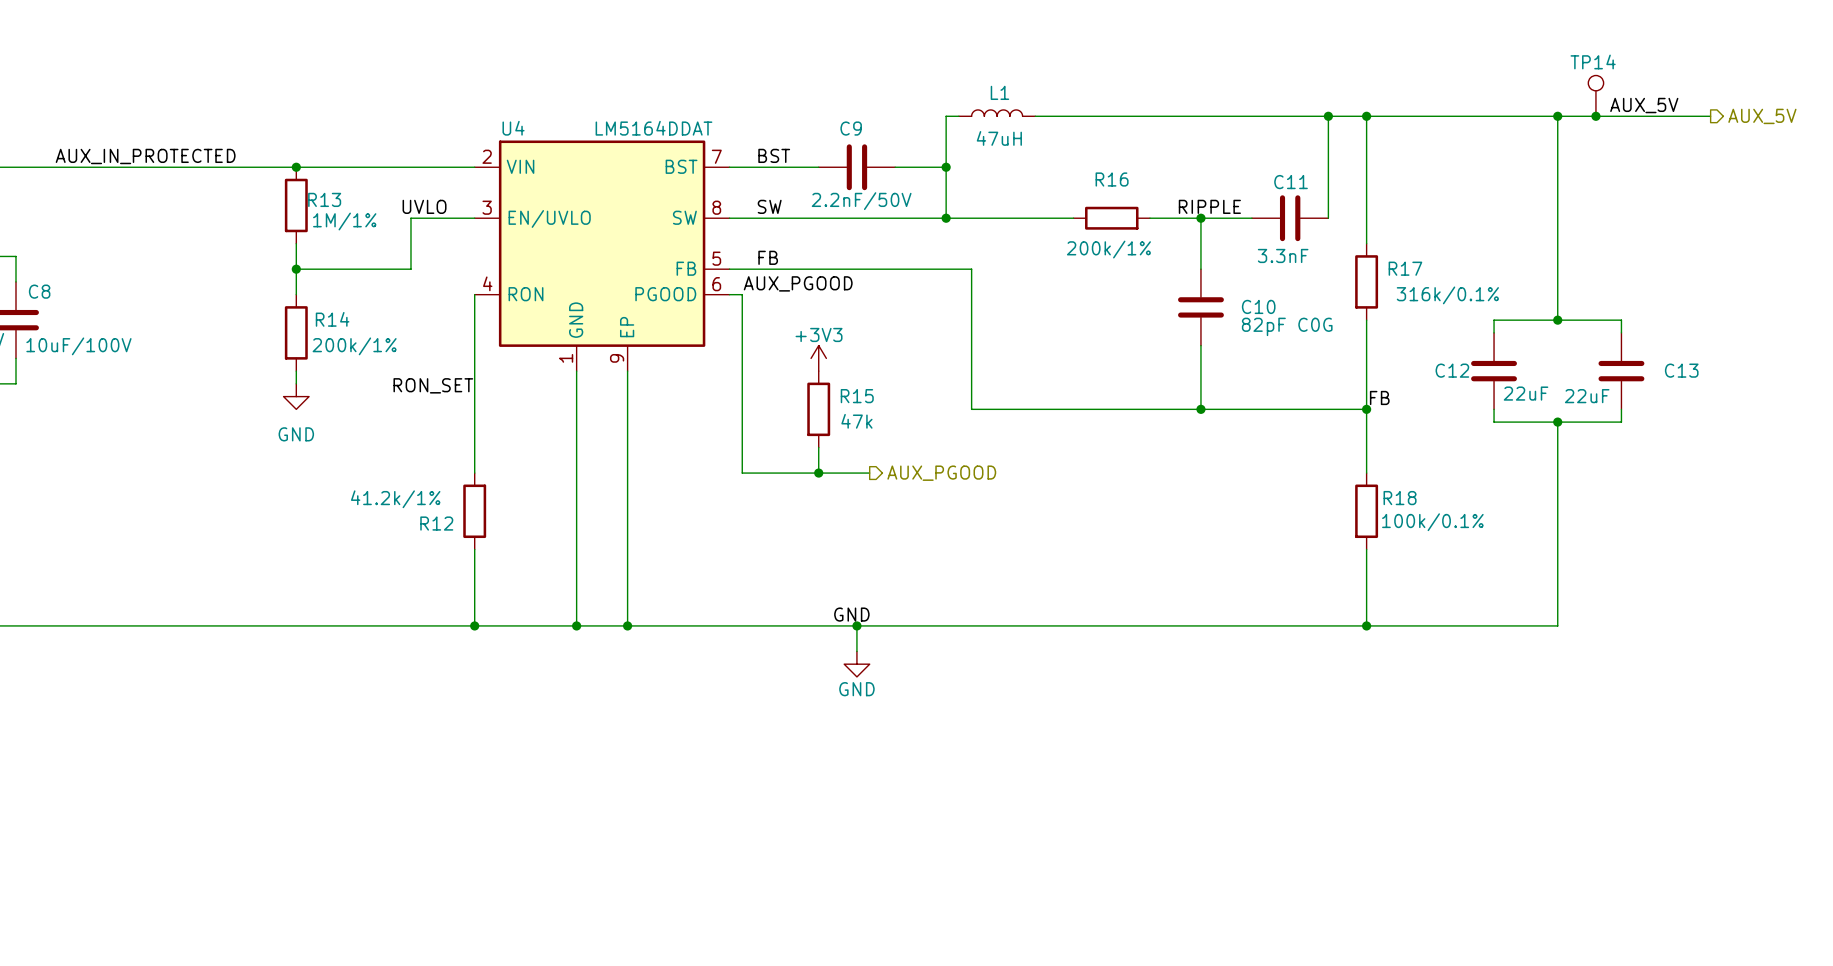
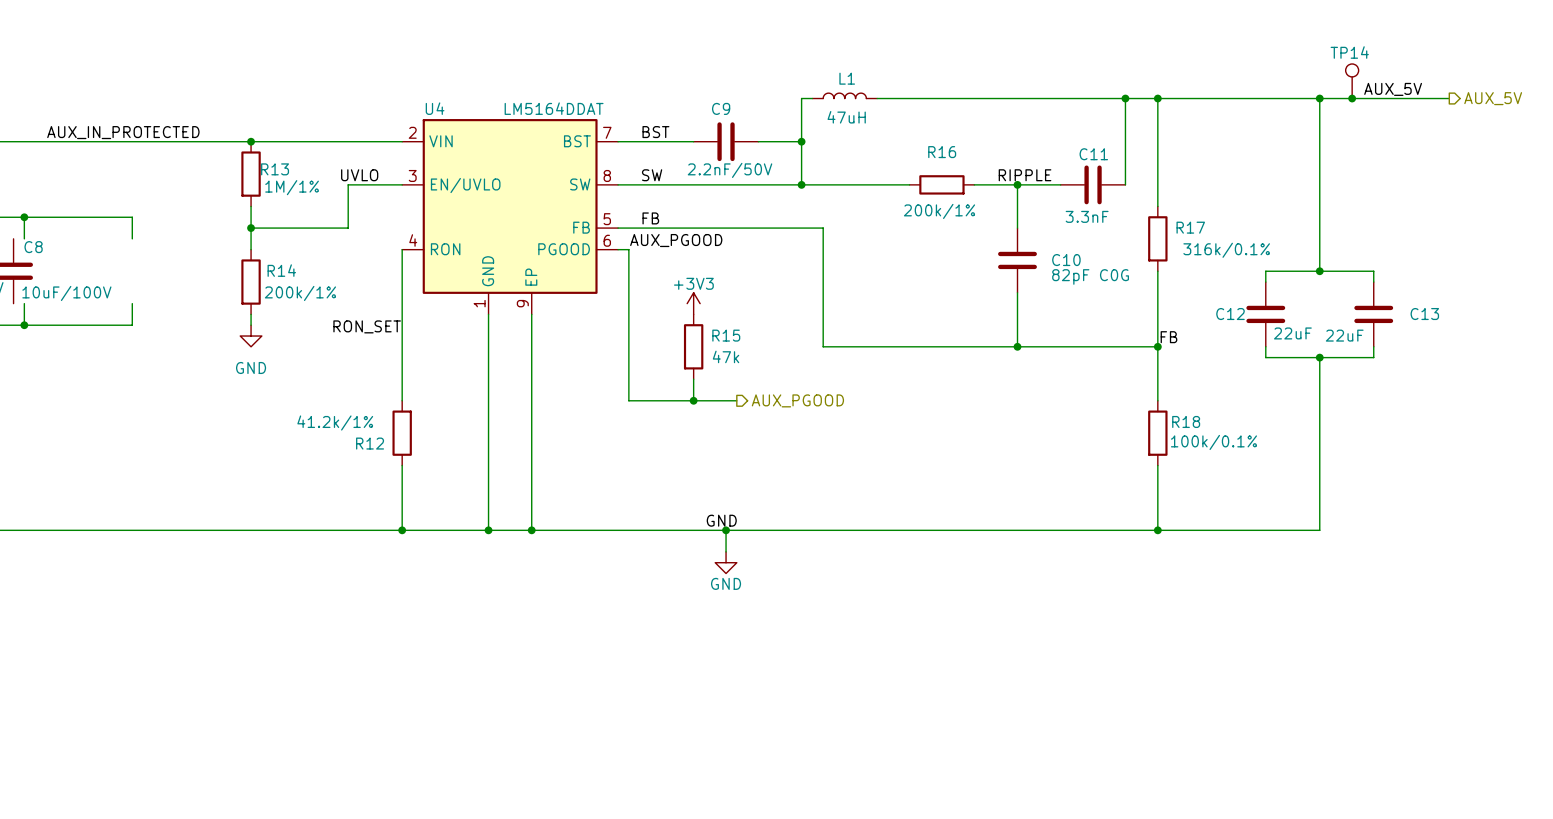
wire: (16, 256) (16, 281) -> (13, 217) (132, 217) (132, 238)
wire: none -> (24, 217) (24, 238)
junction: none -> (24, 217)
wire: (16, 358) (16, 383) -> (132, 303) (132, 325) (13, 325)
wire: none -> (24, 303) (24, 325)
junction: none -> (24, 325)

